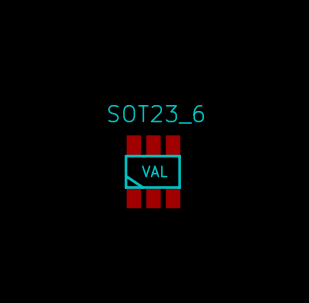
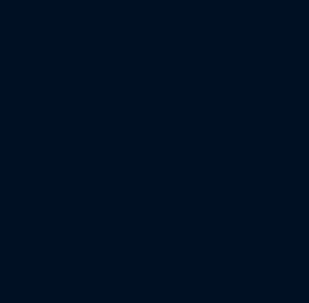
SOT23_6: VAL (152, 171) -> none

